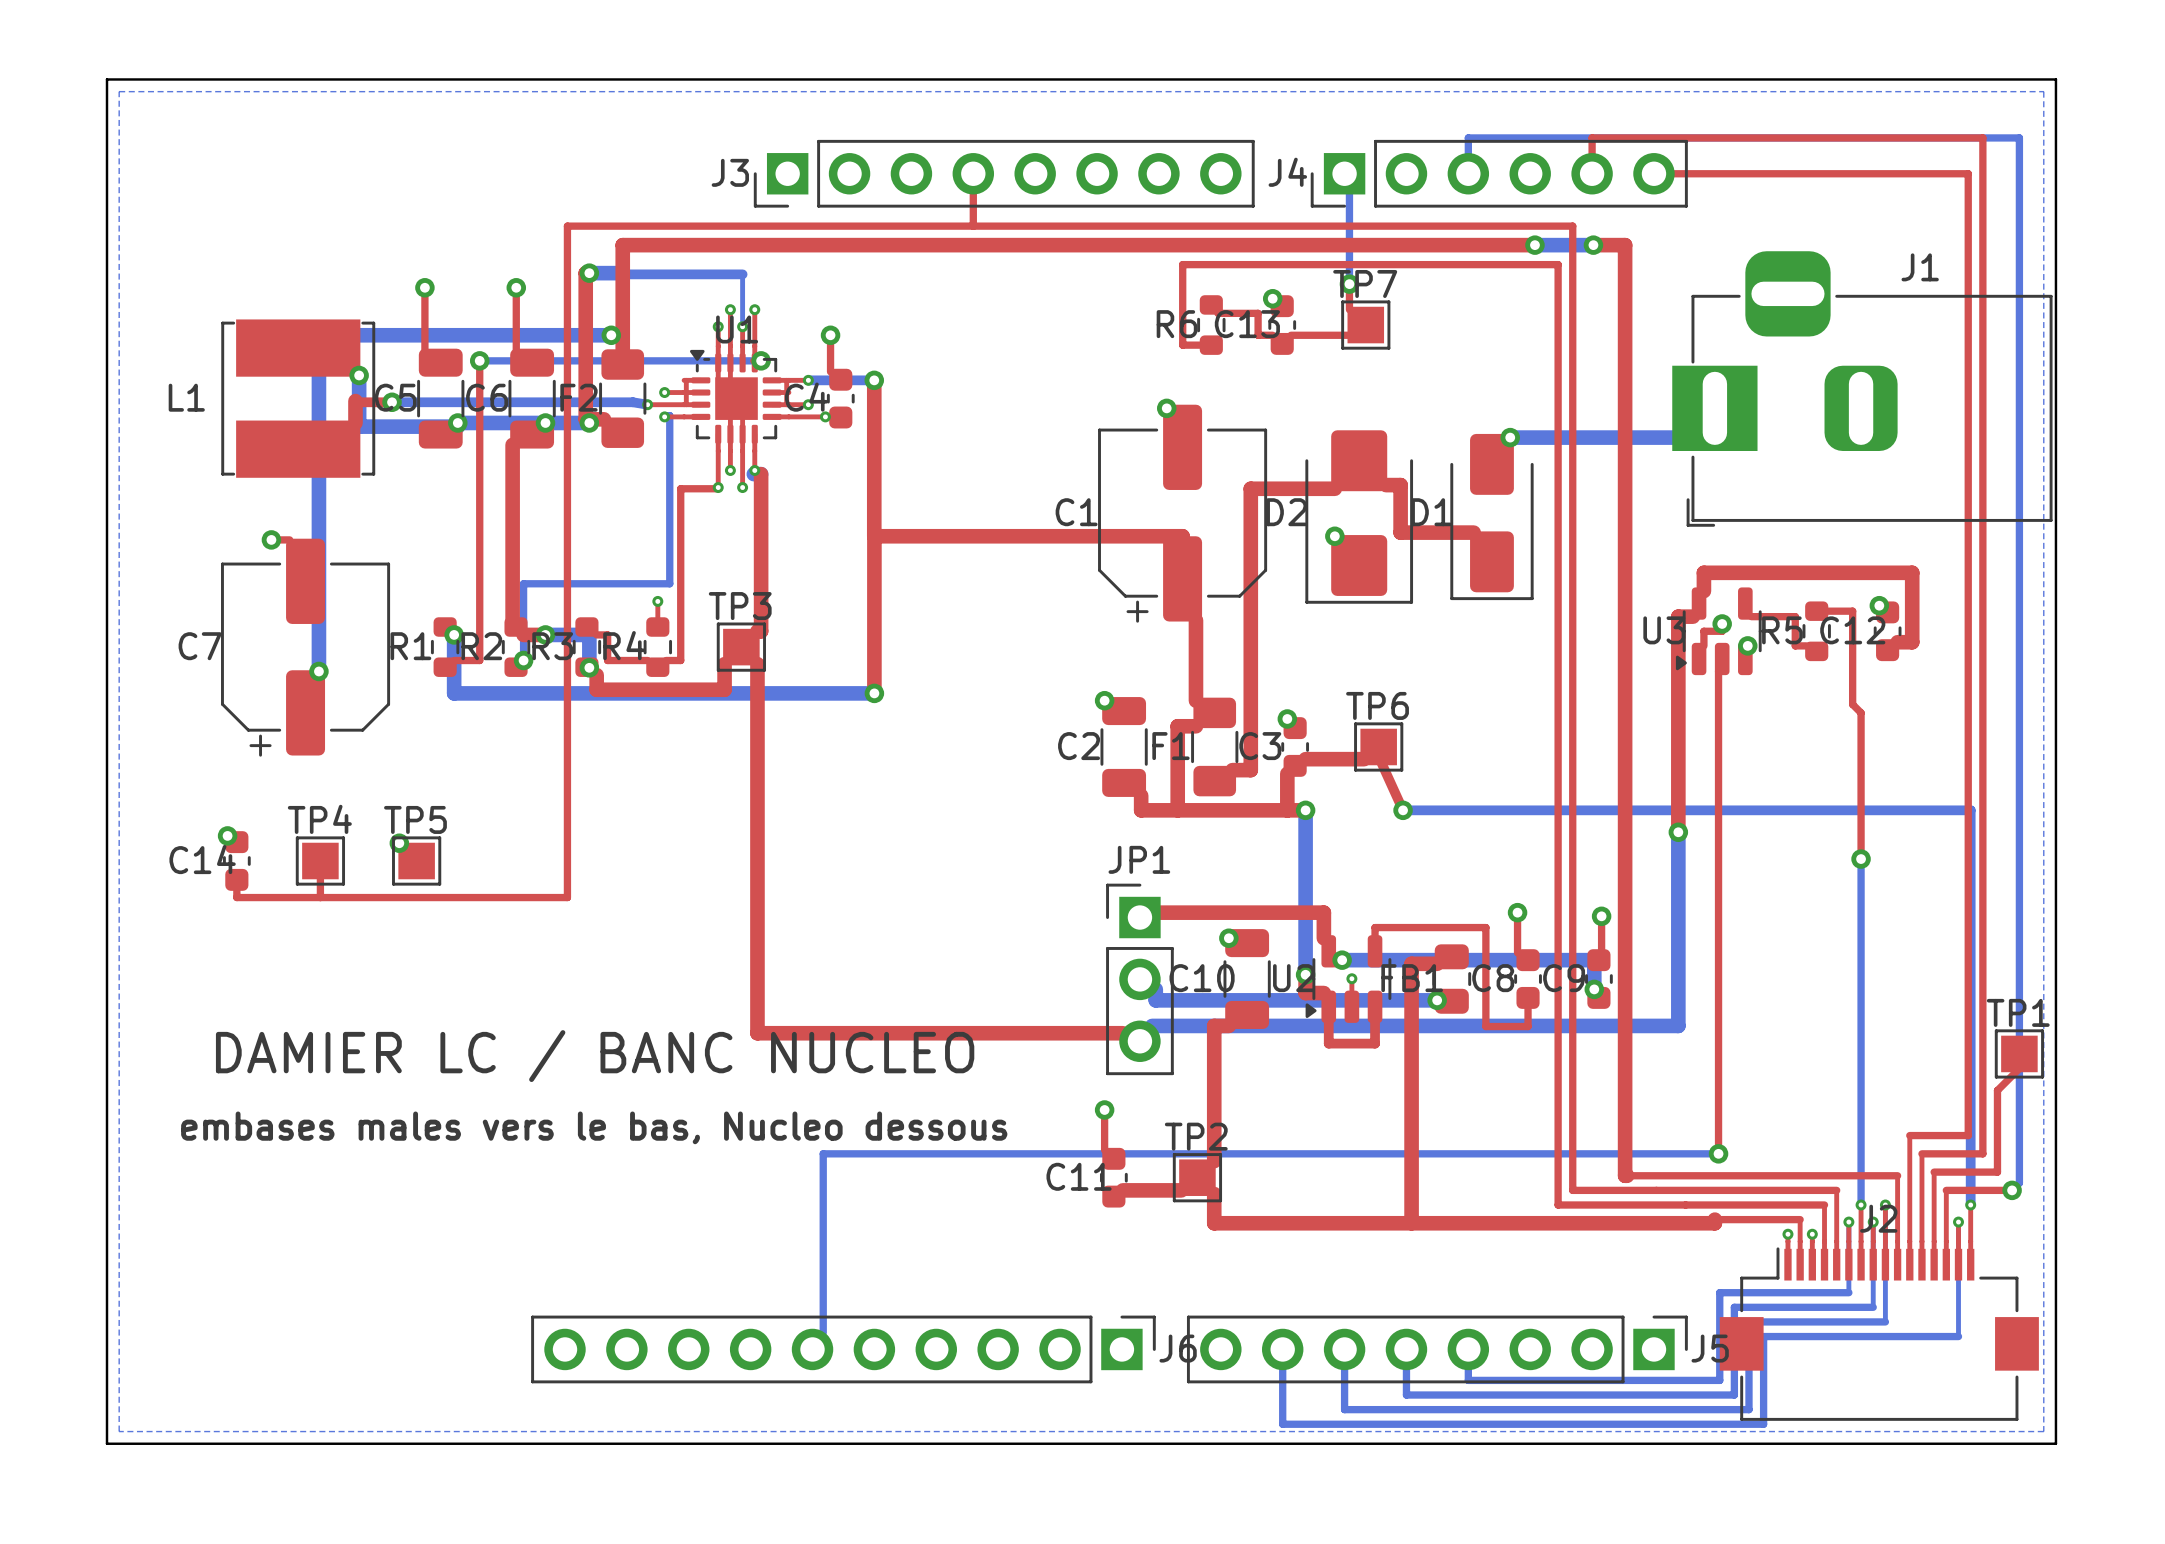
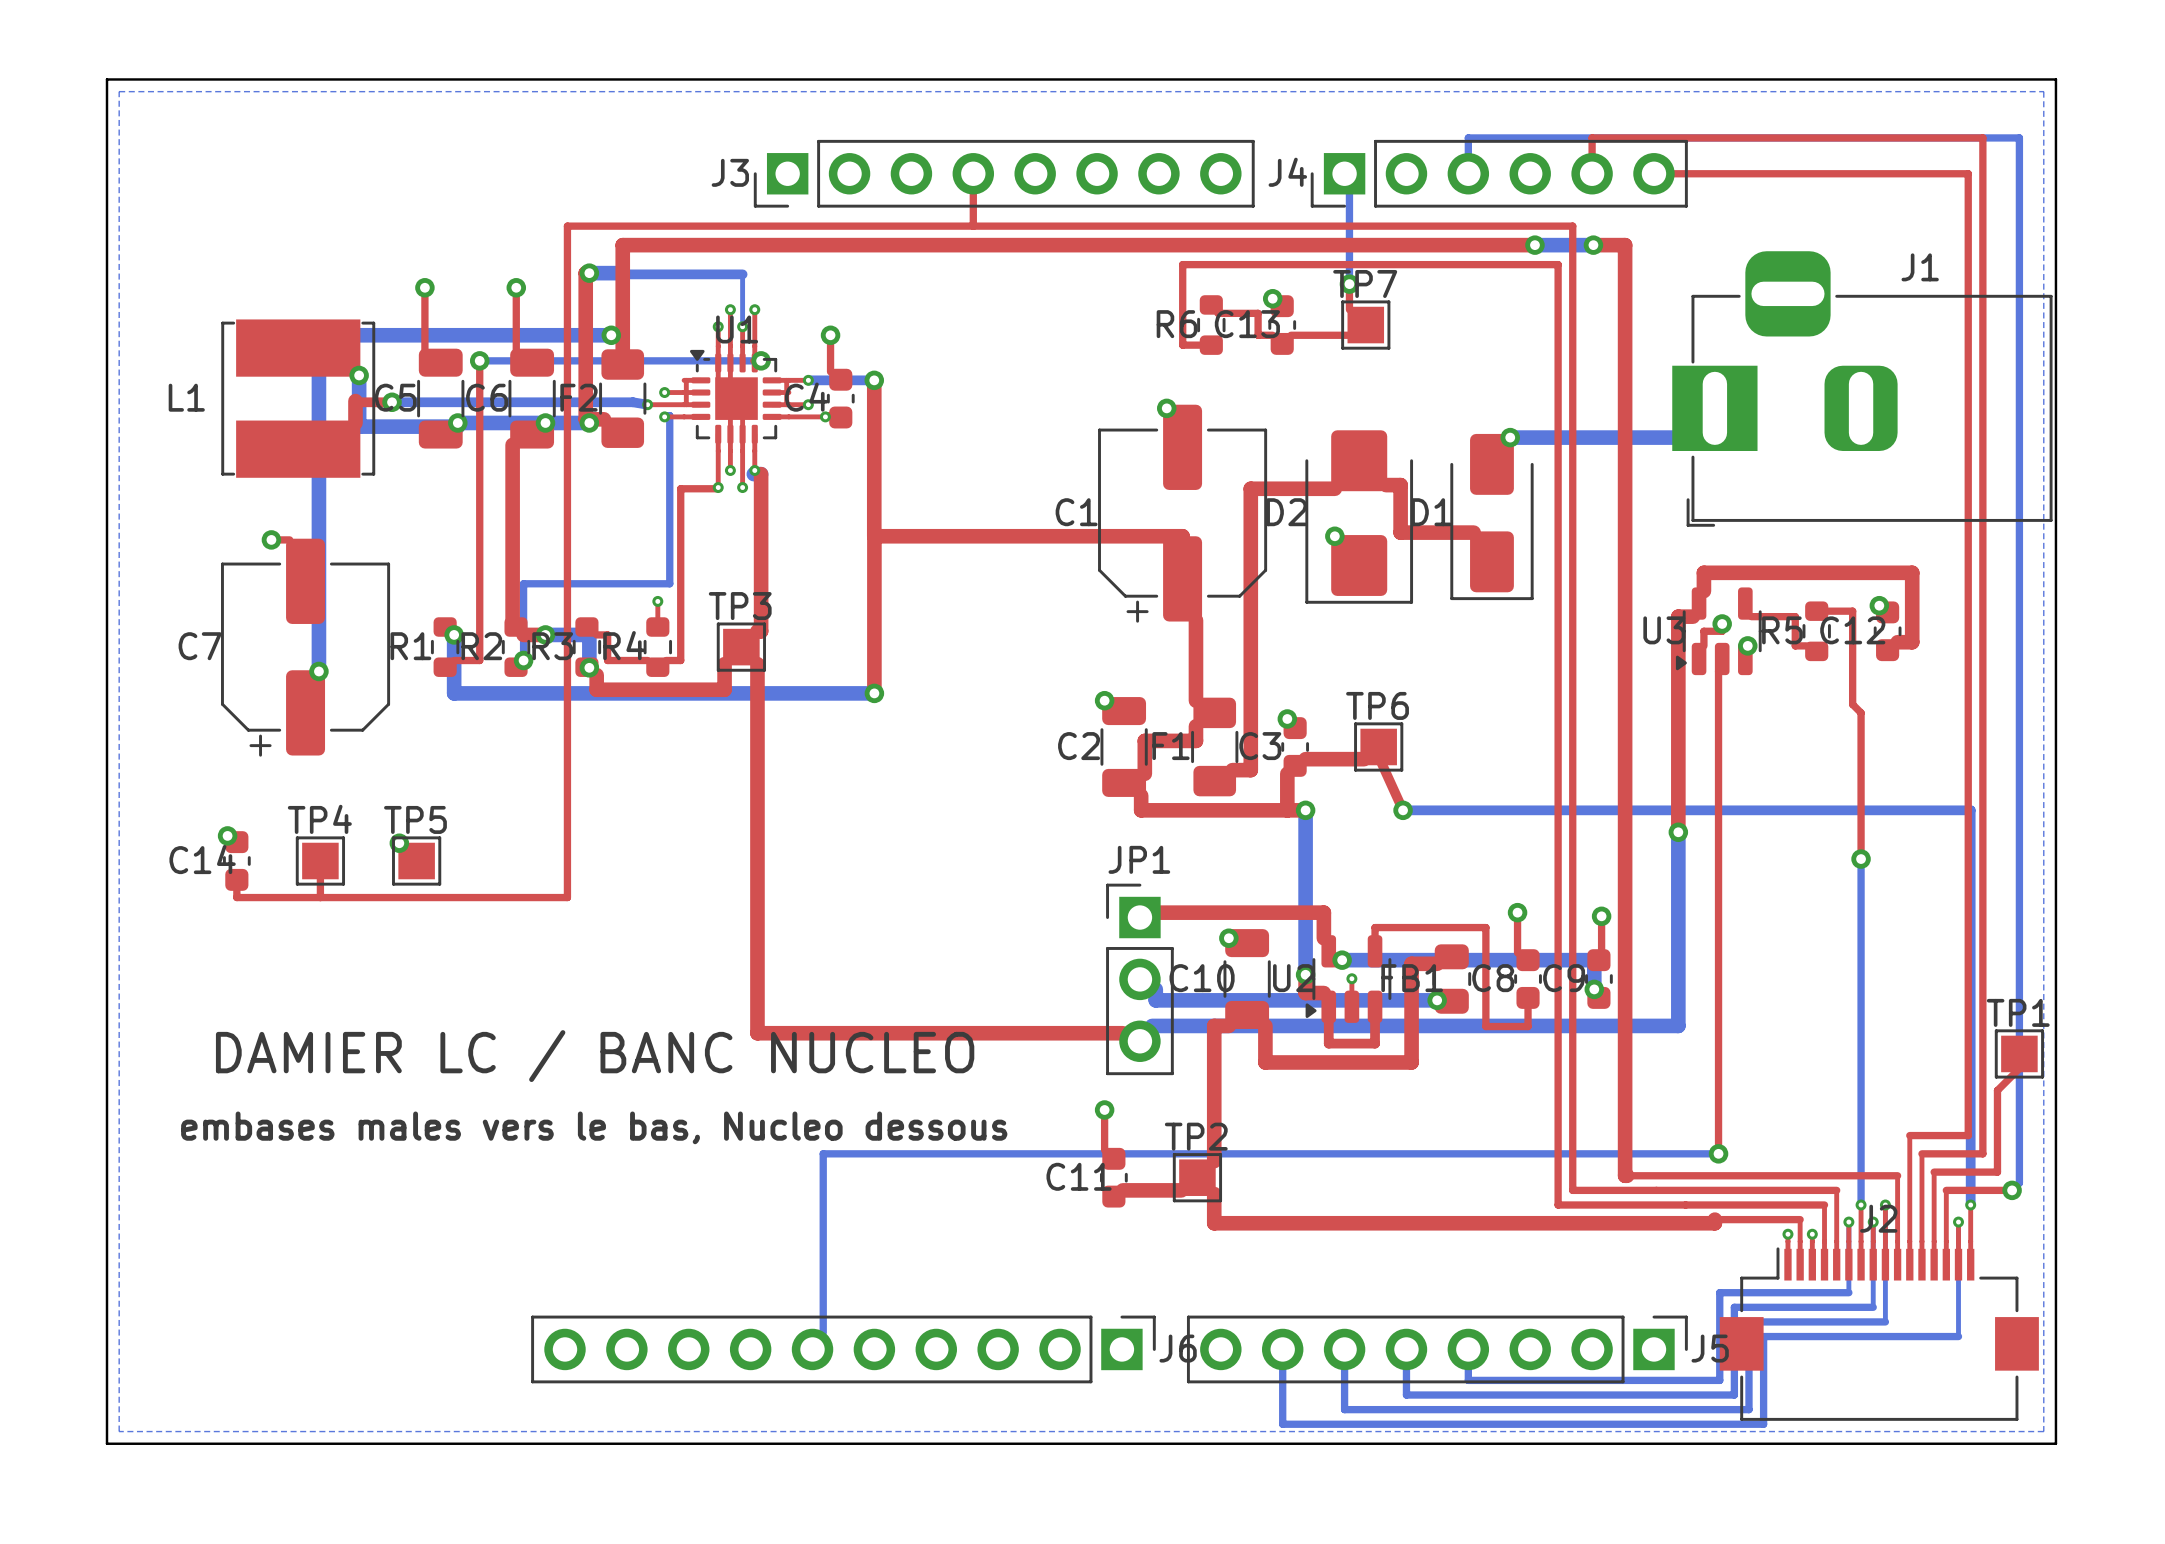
top track: (1195, 726) (1177, 726) (1177, 810) -> (1195, 726) (1195, 740) (1144, 740) (1144, 773)
top track: (1411, 1062) (1411, 1223) -> (1411, 1062) (1265, 1062) (1265, 1025)

